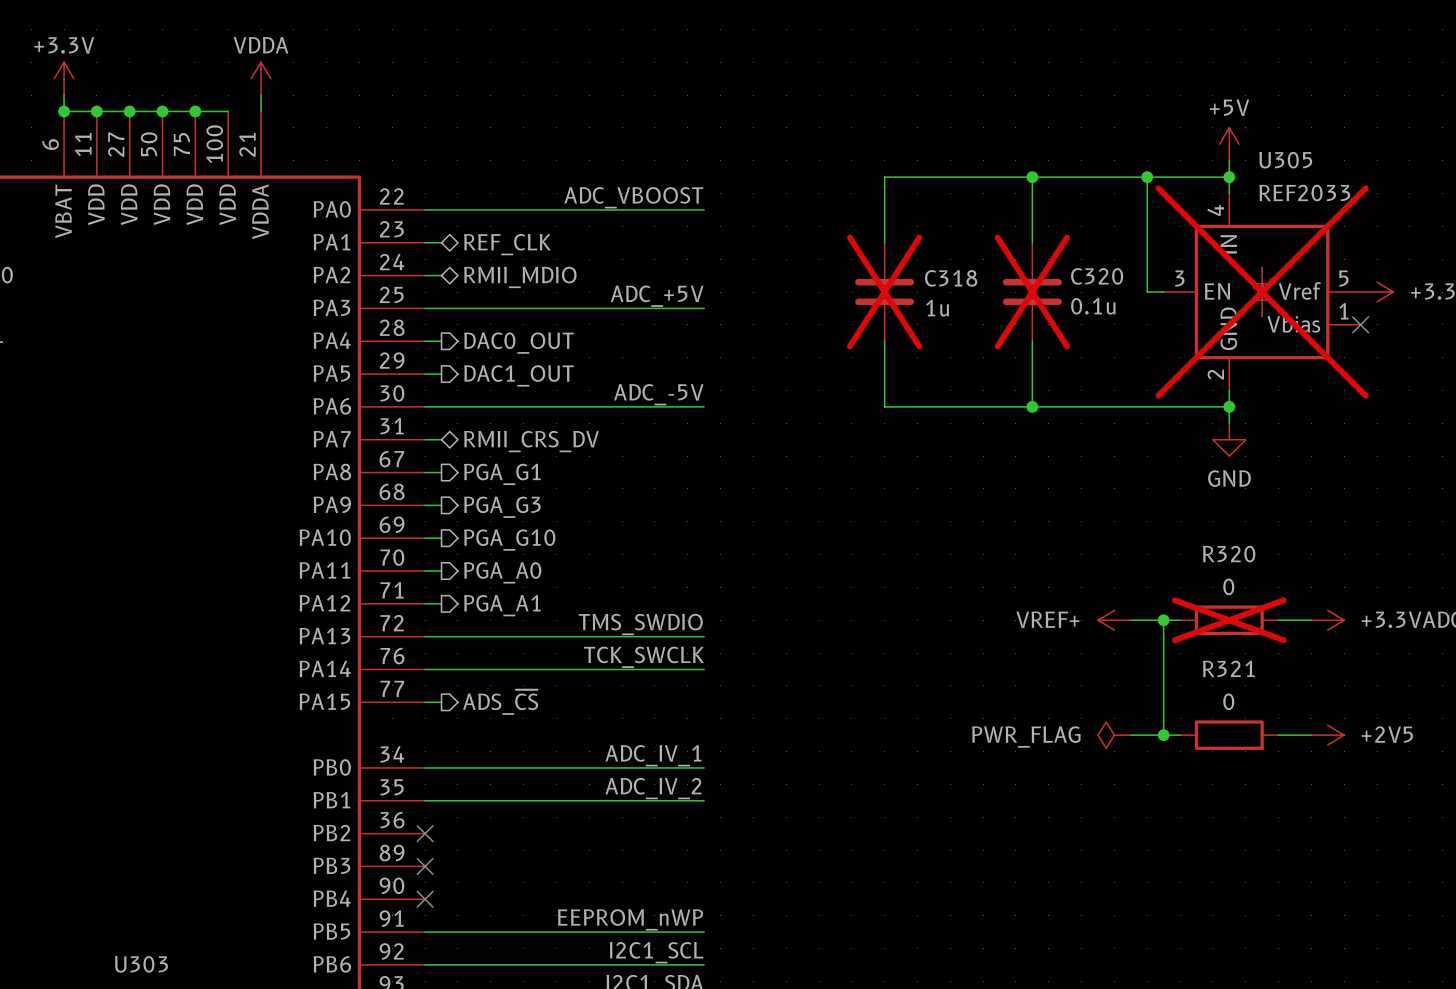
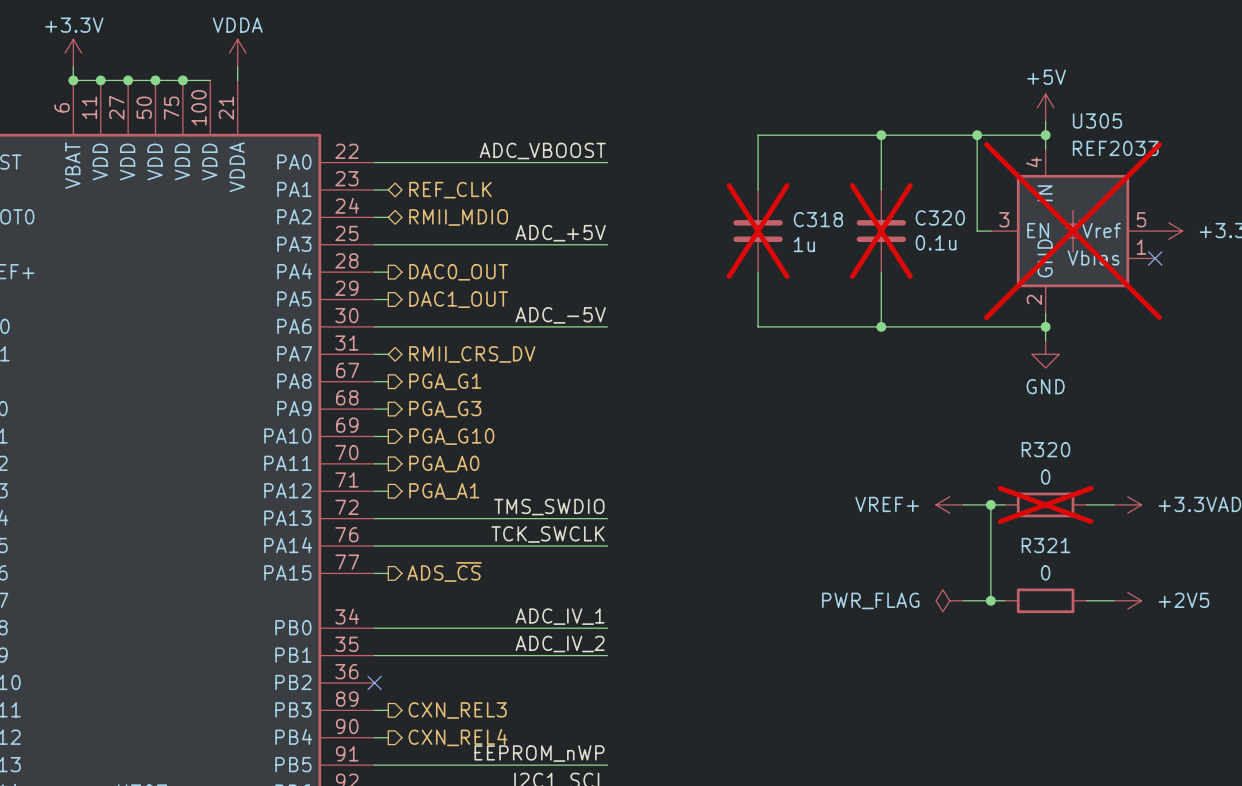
wire: none -> (374, 710) (388, 710)
no-connect mark: (425, 866) -> none
hierarchical label: none -> CXN_REL3 (457, 710)
wire: none -> (374, 737) (388, 737)
no-connect mark: (425, 899) -> none
hierarchical label: none -> CXN_REL4 (457, 737)

